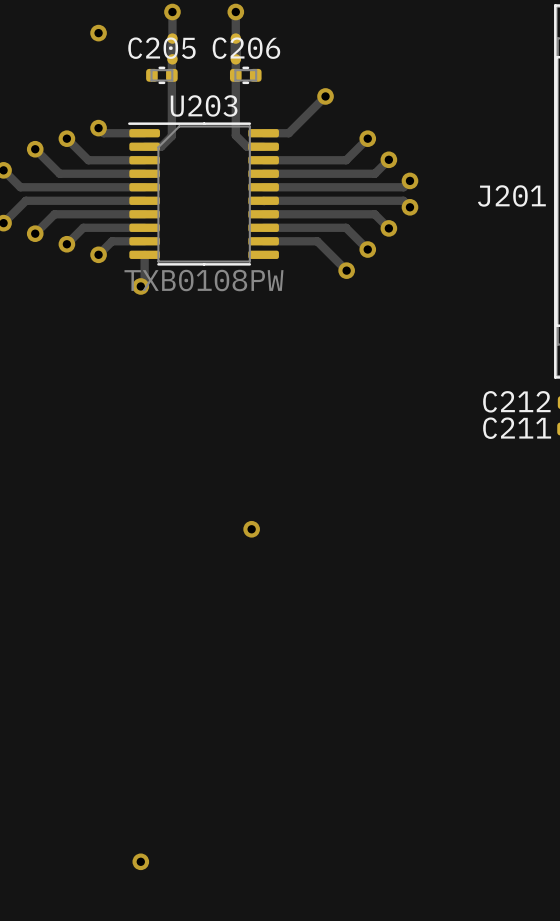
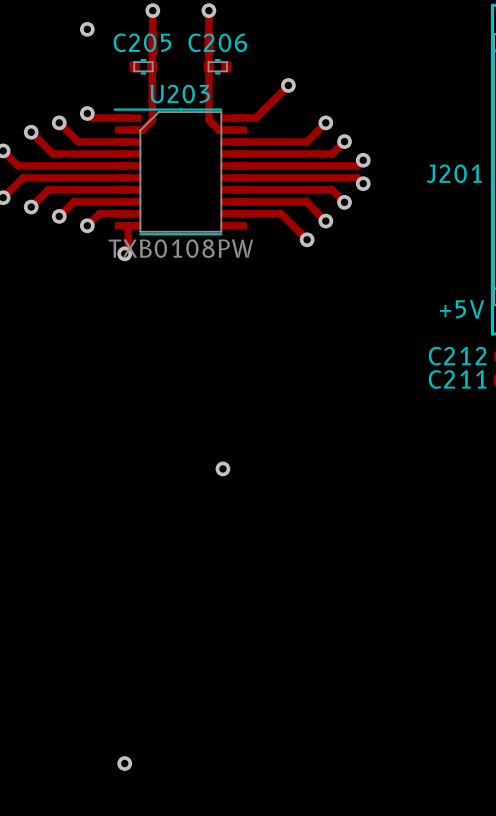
text: none -> +5V (462, 309)

